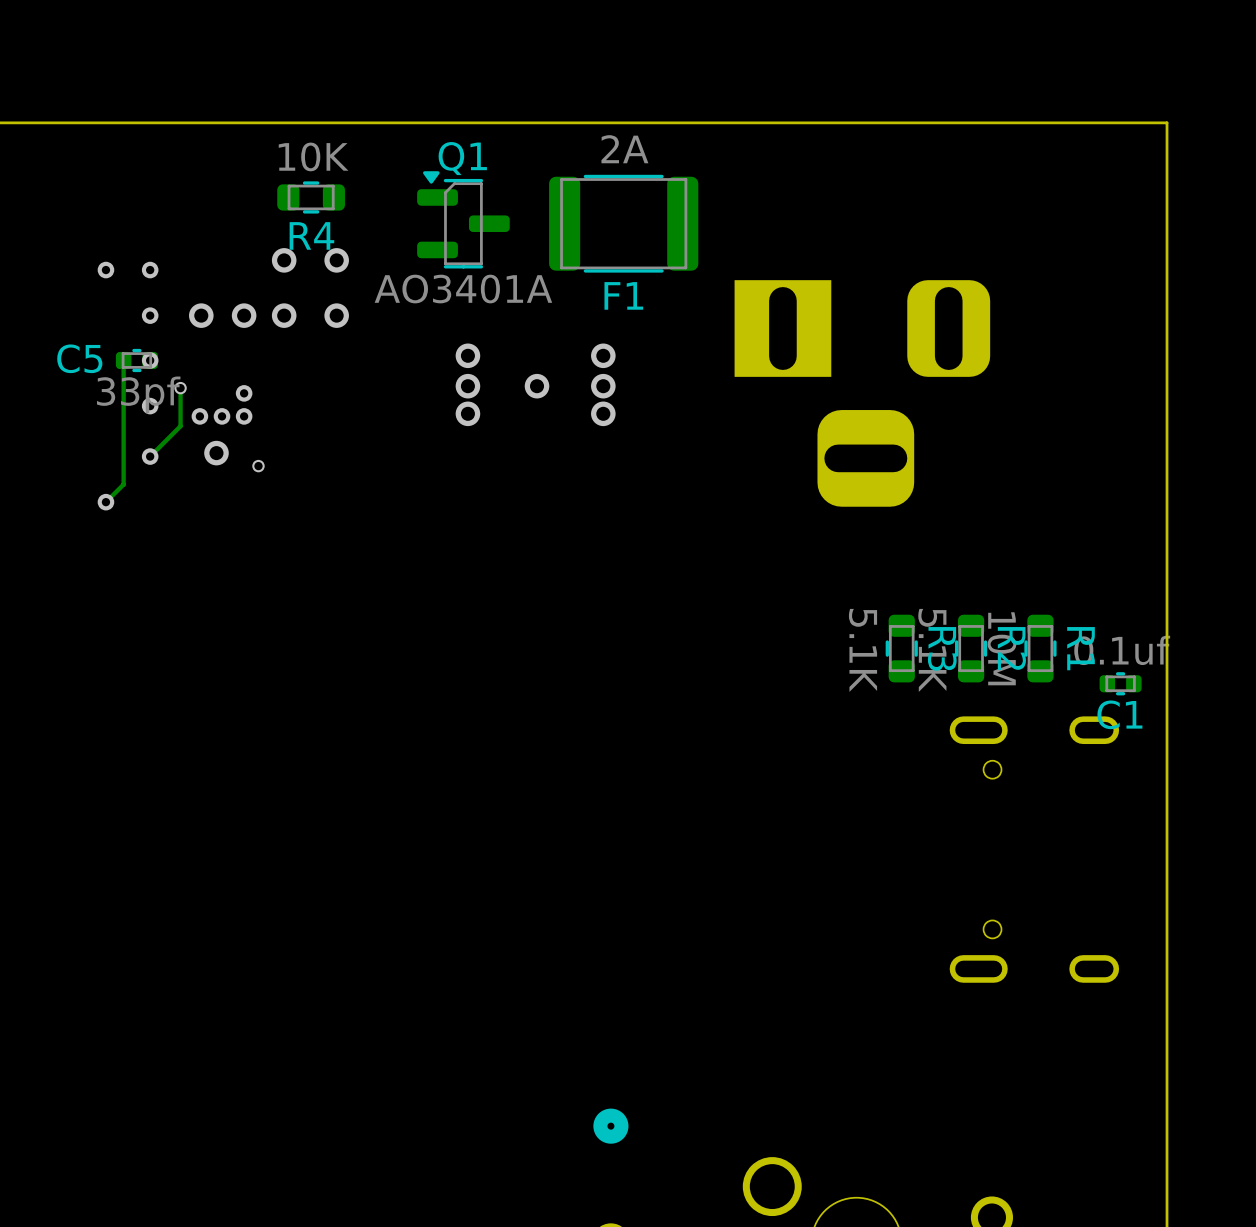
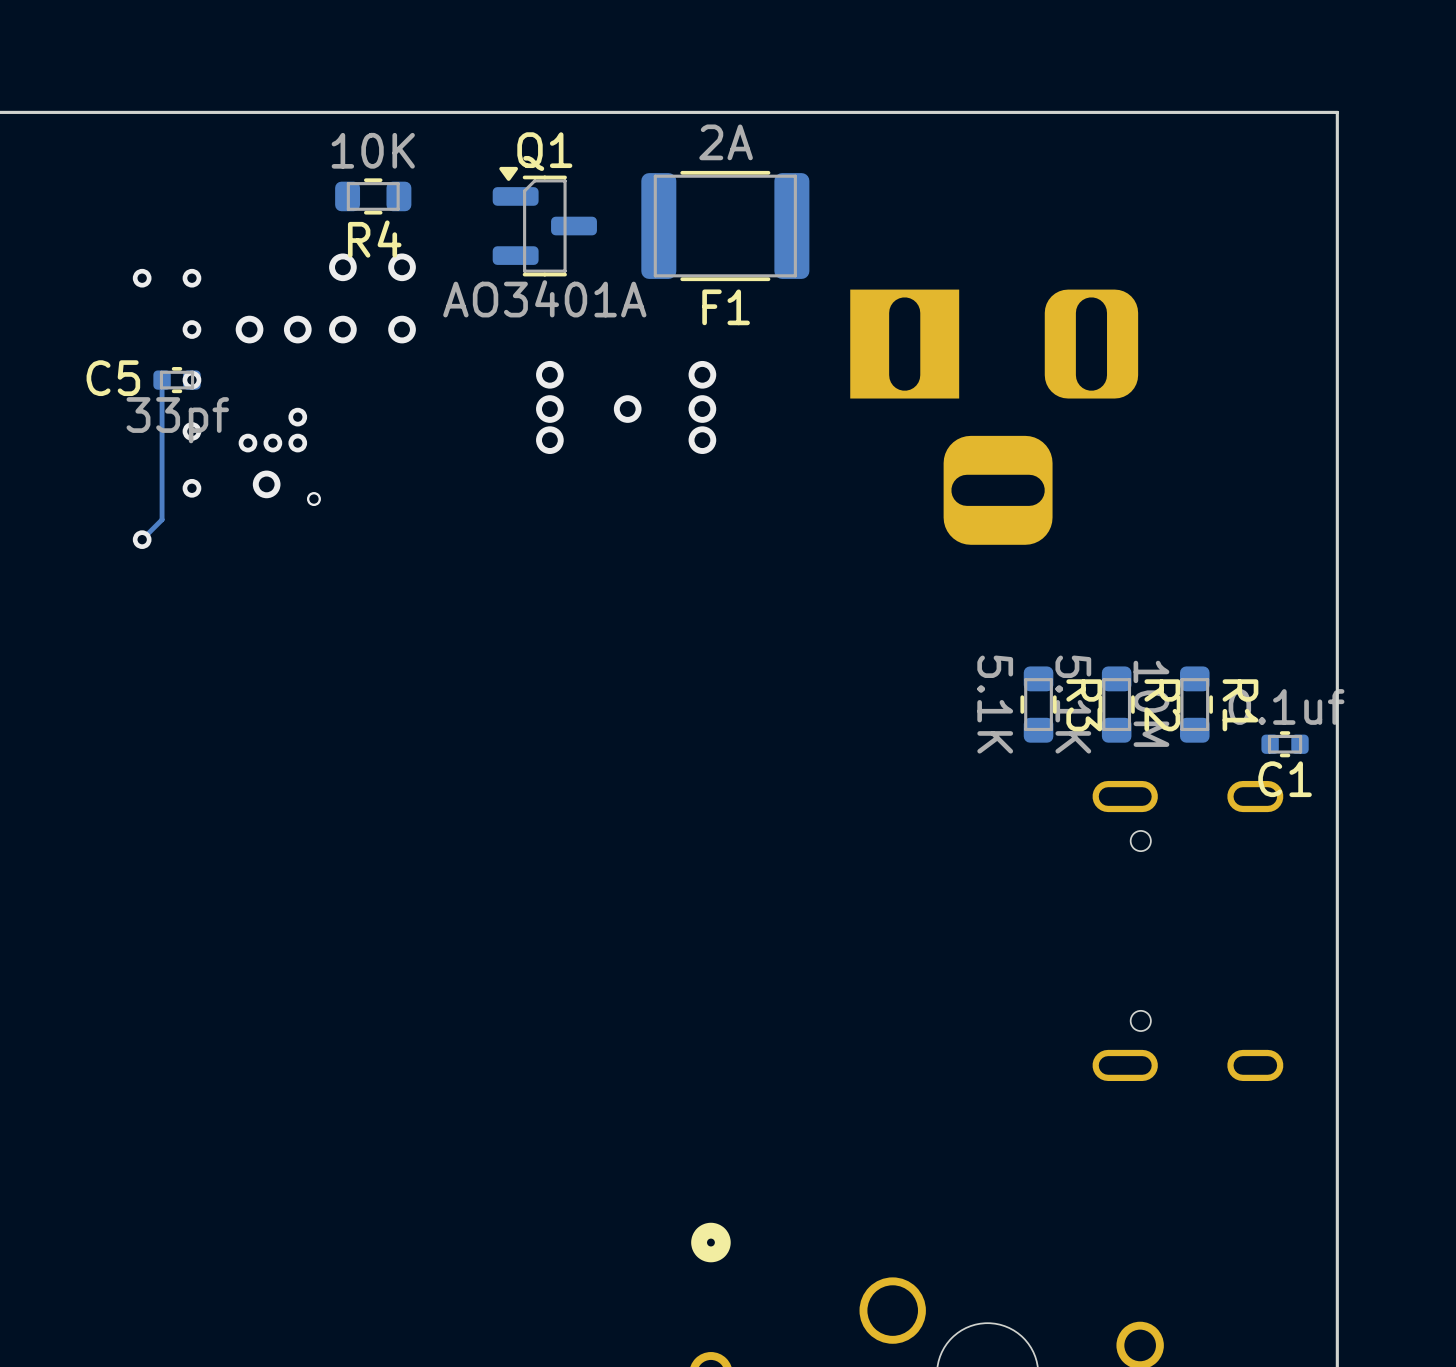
track: (180, 388) (180, 426) (150, 456) -> none
via: (180, 388) -> none

